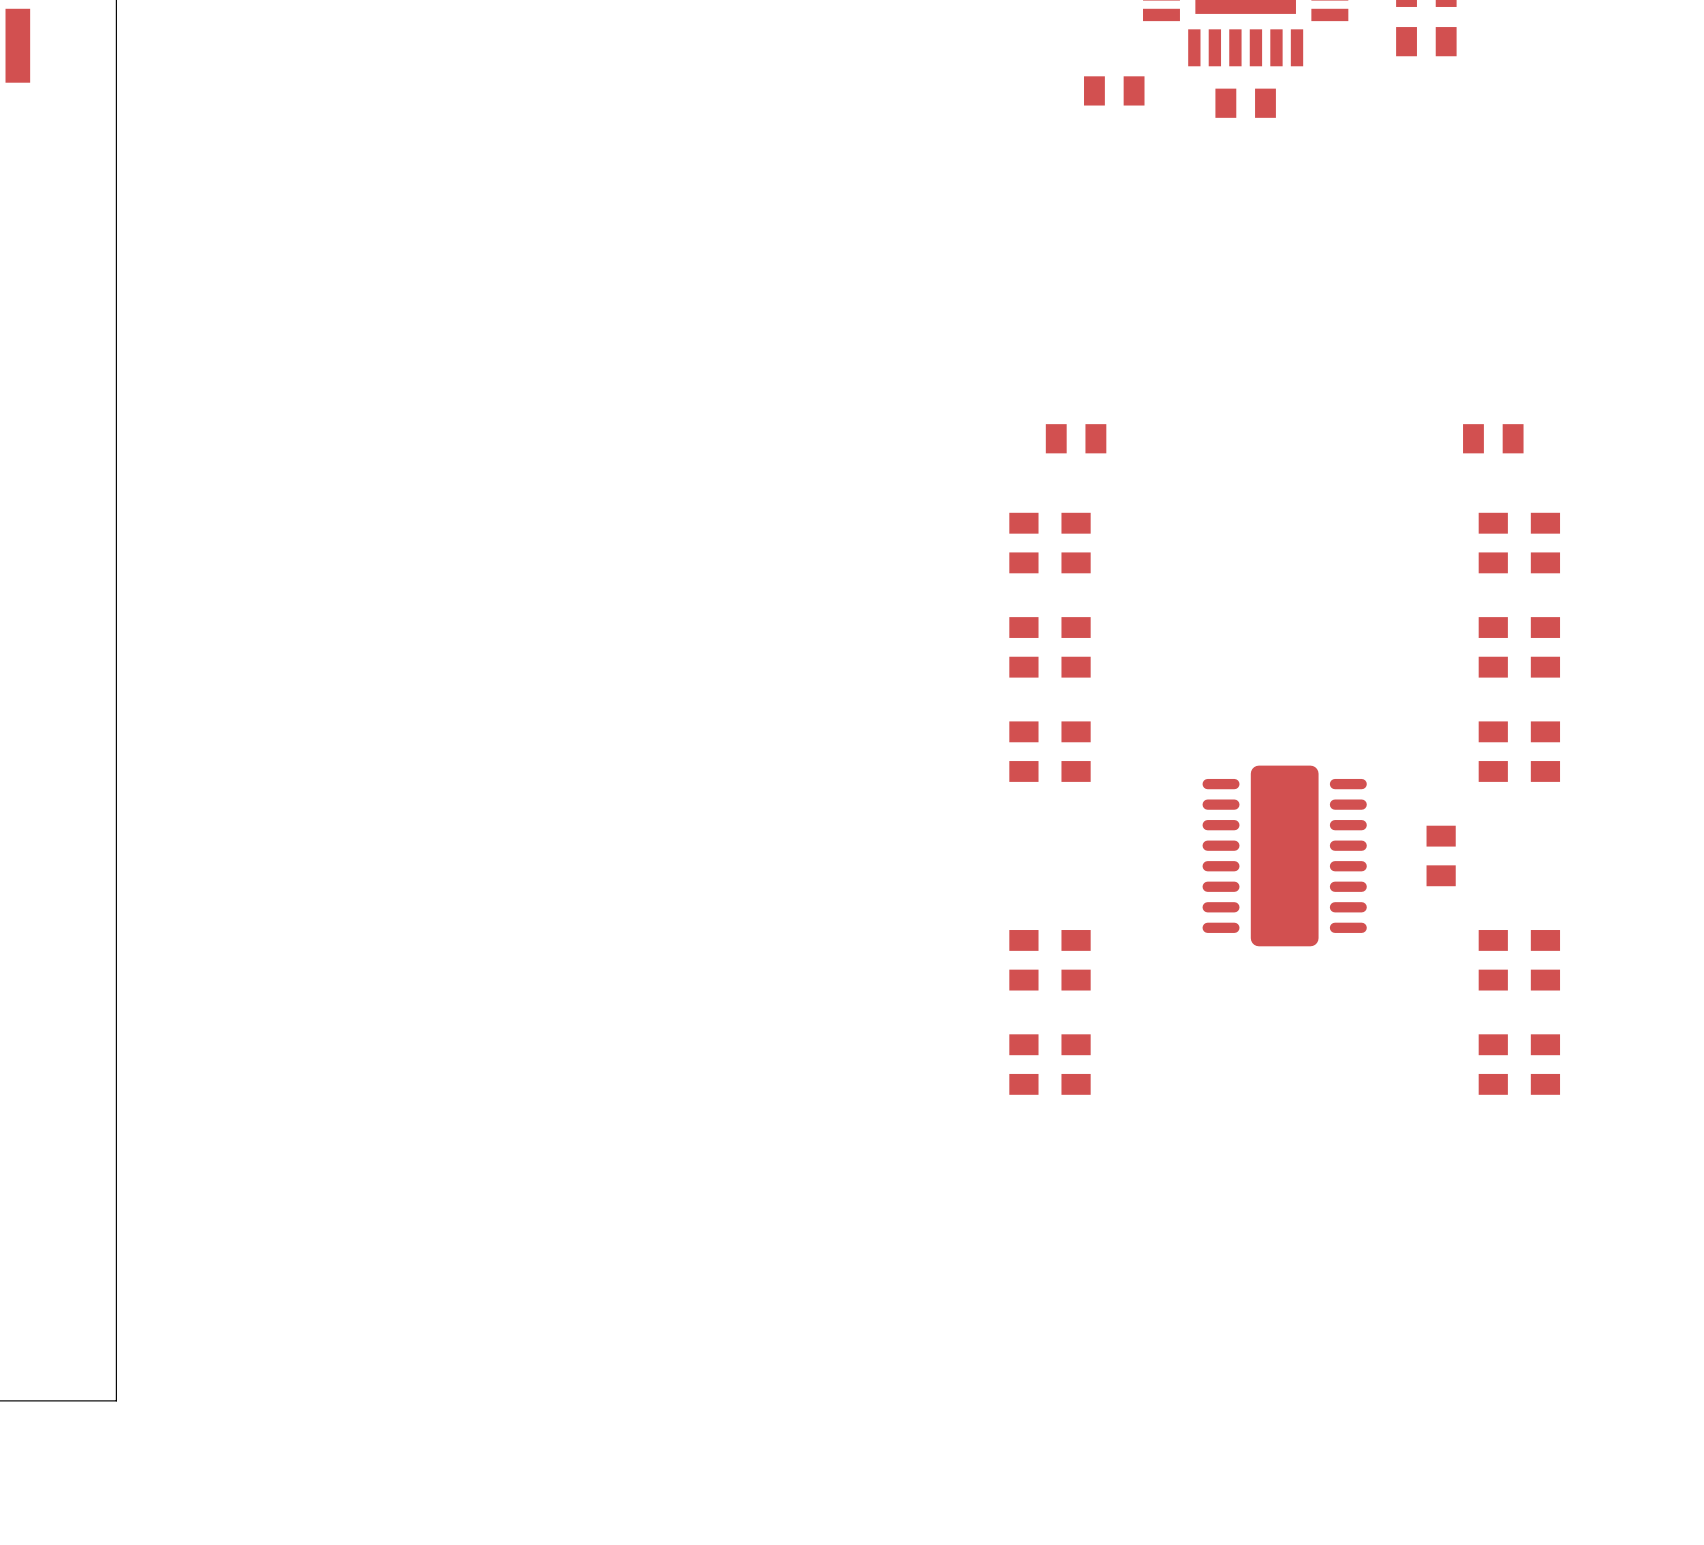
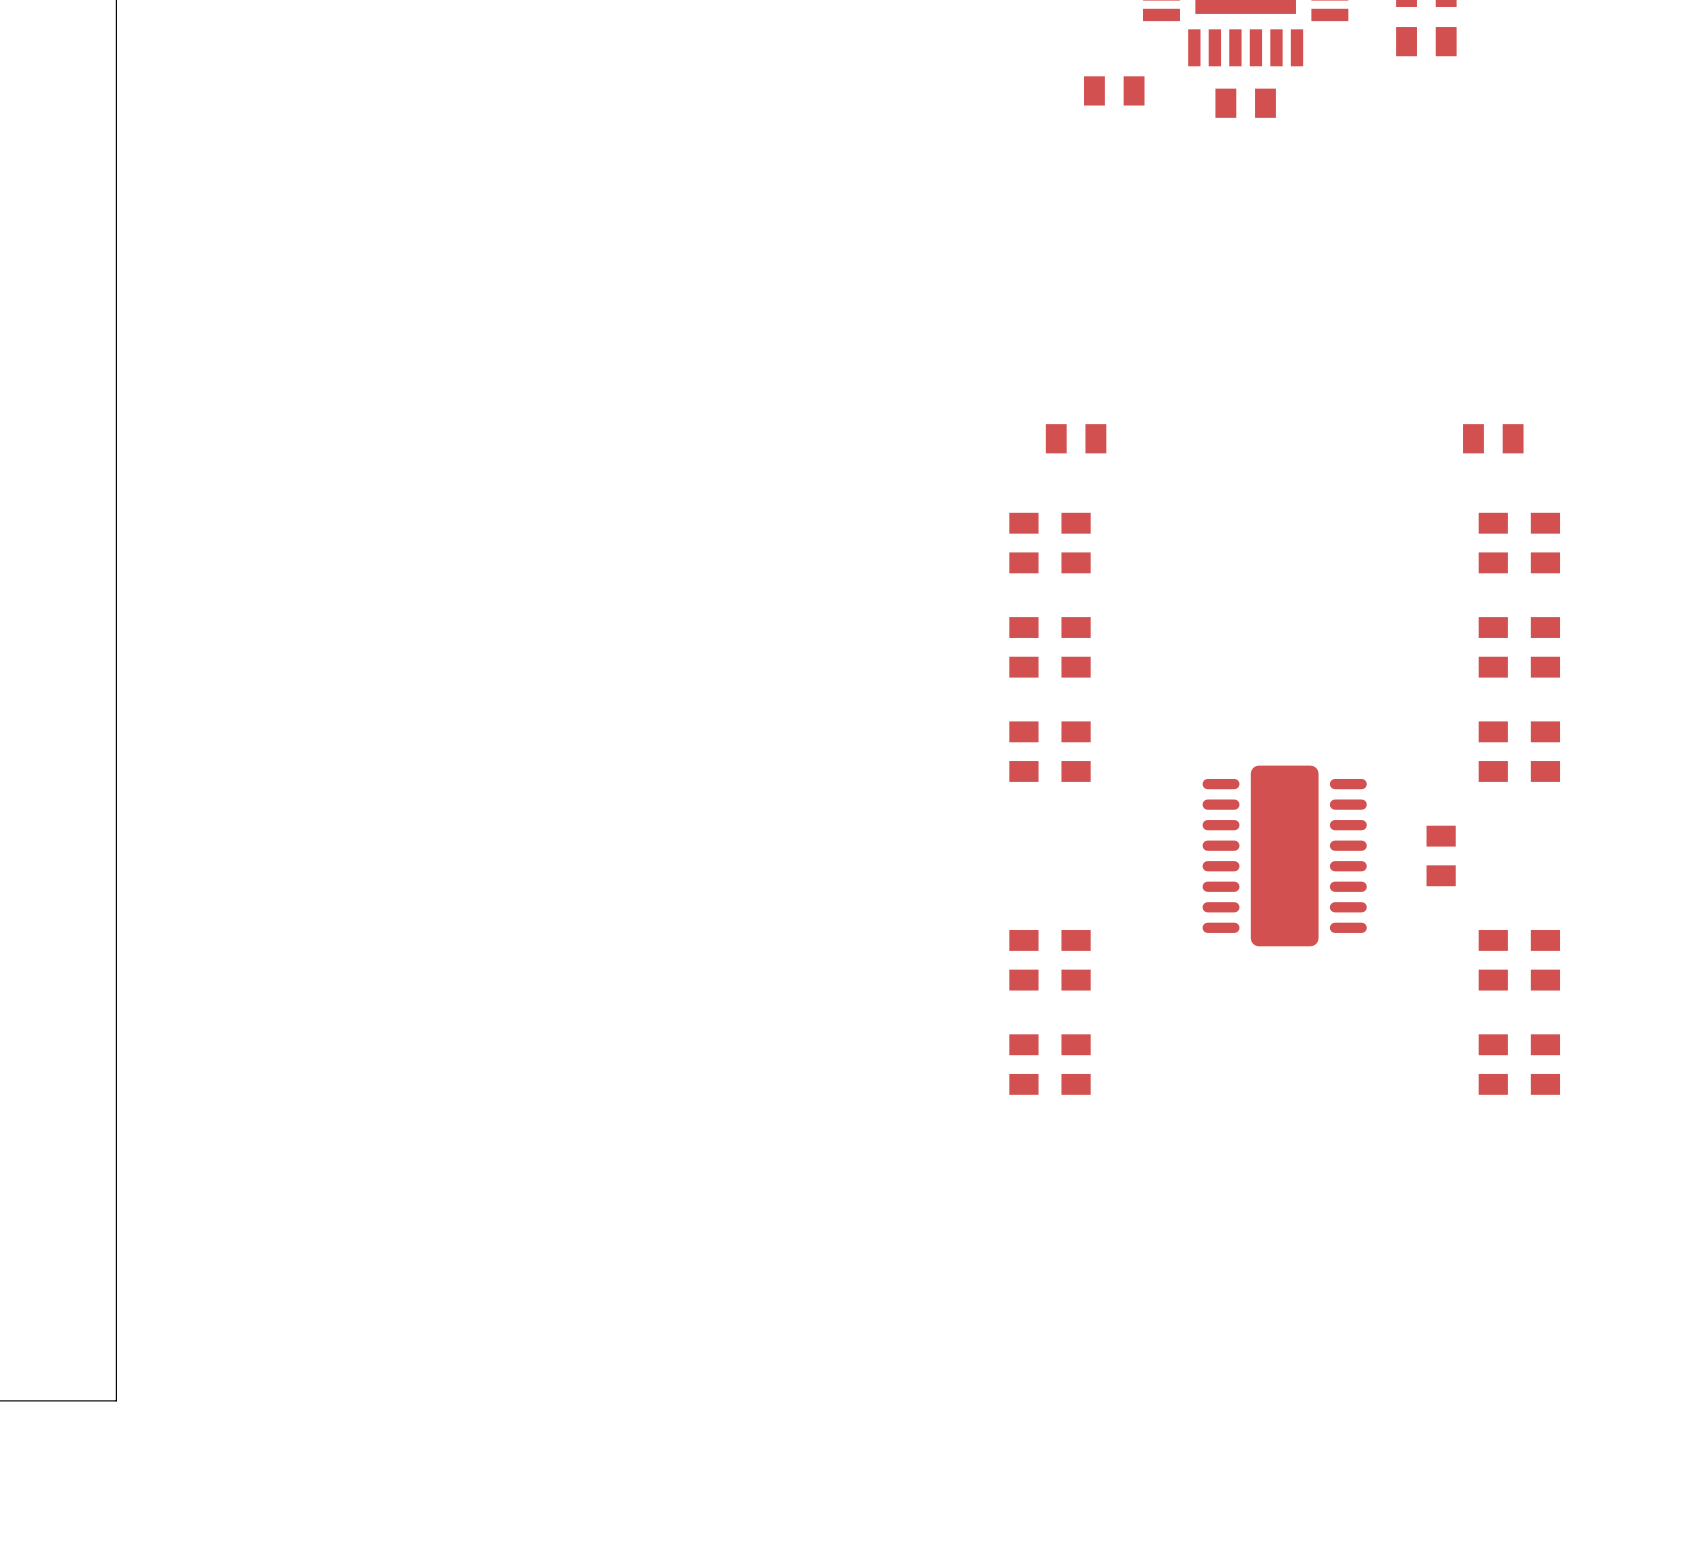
part: (17, 45) -> none

